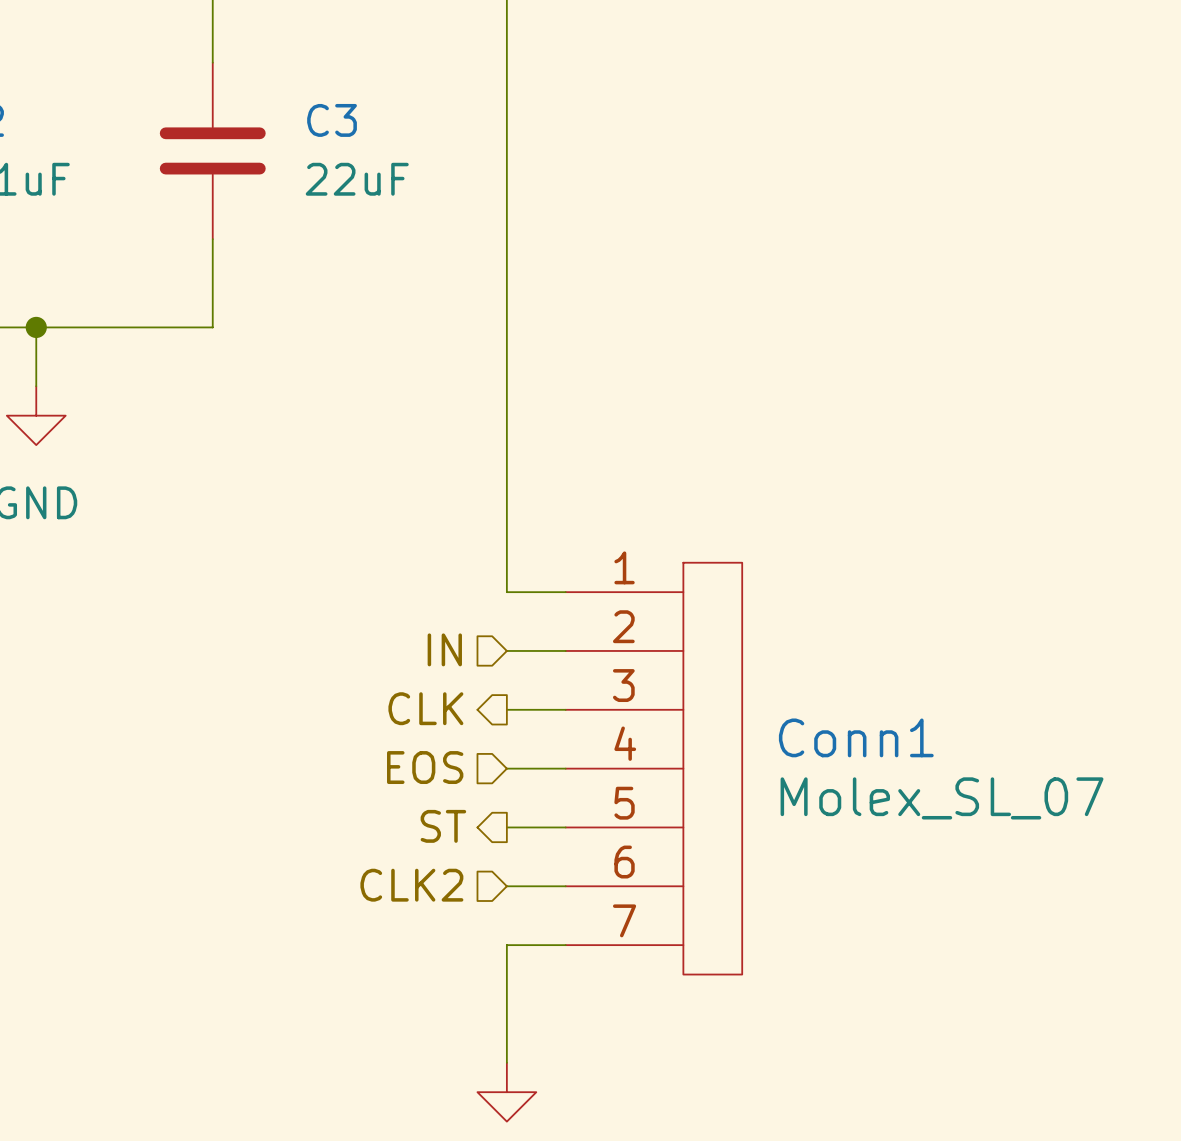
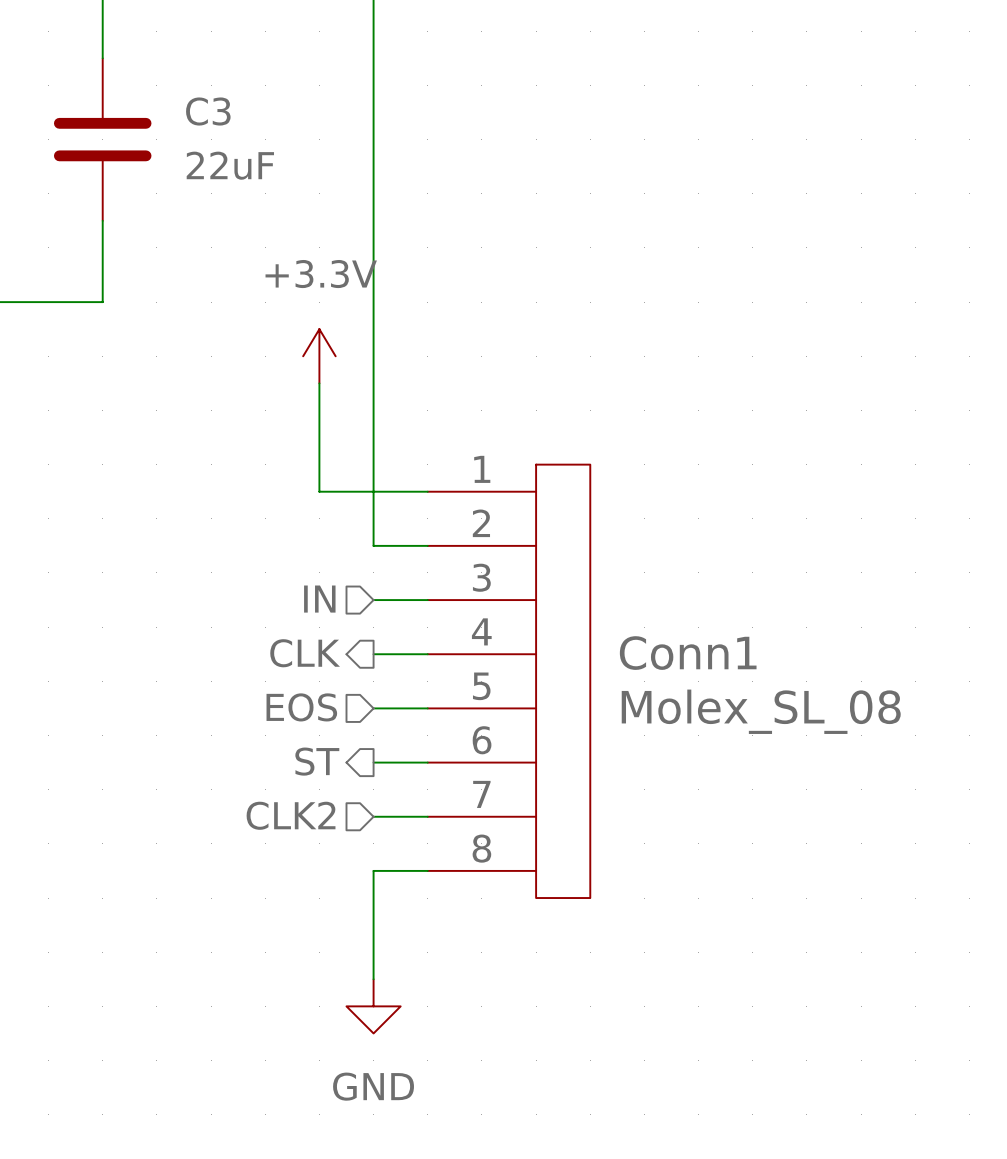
power symbol: none -> +3.3V (319, 356)
wire: none -> (319, 383) (319, 491) (427, 491)
Conn1 symbol: [565, 562, 743, 975] -> [427, 464, 591, 899]
Conn1 value: Molex_SL_07 (942, 798) -> Molex_SL_08 (761, 711)

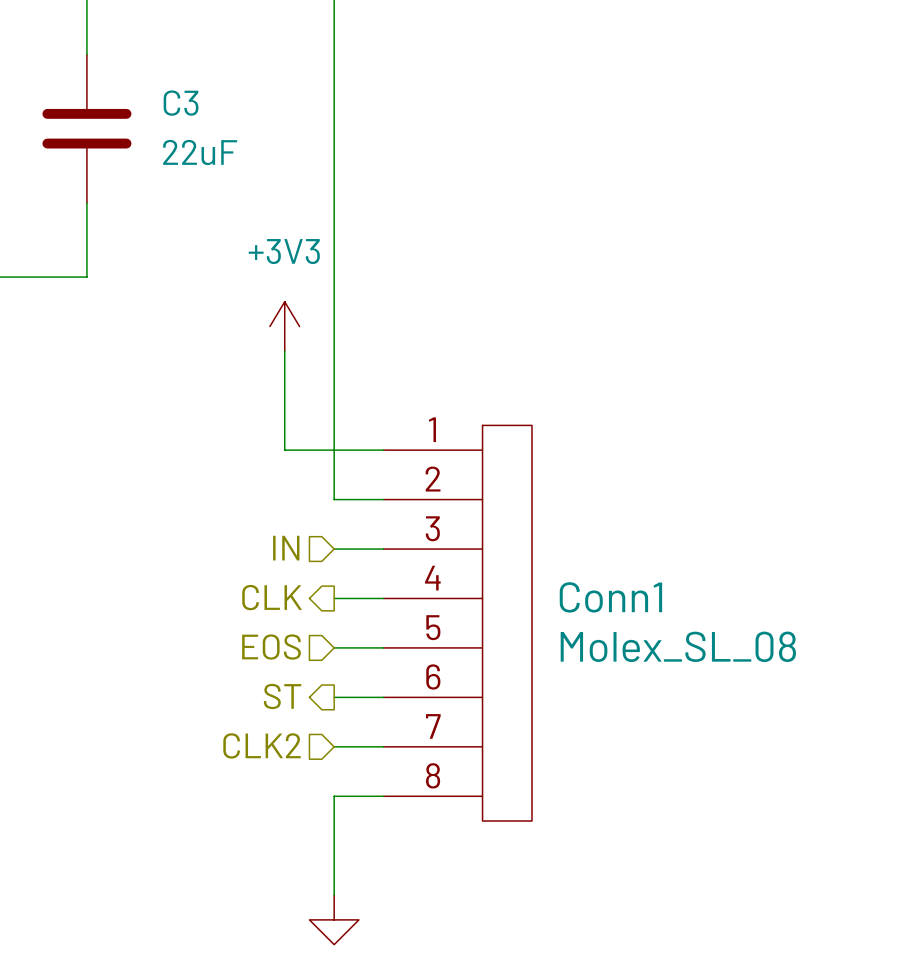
power symbol: +3.3V (319, 356) -> +3V3 (284, 326)

